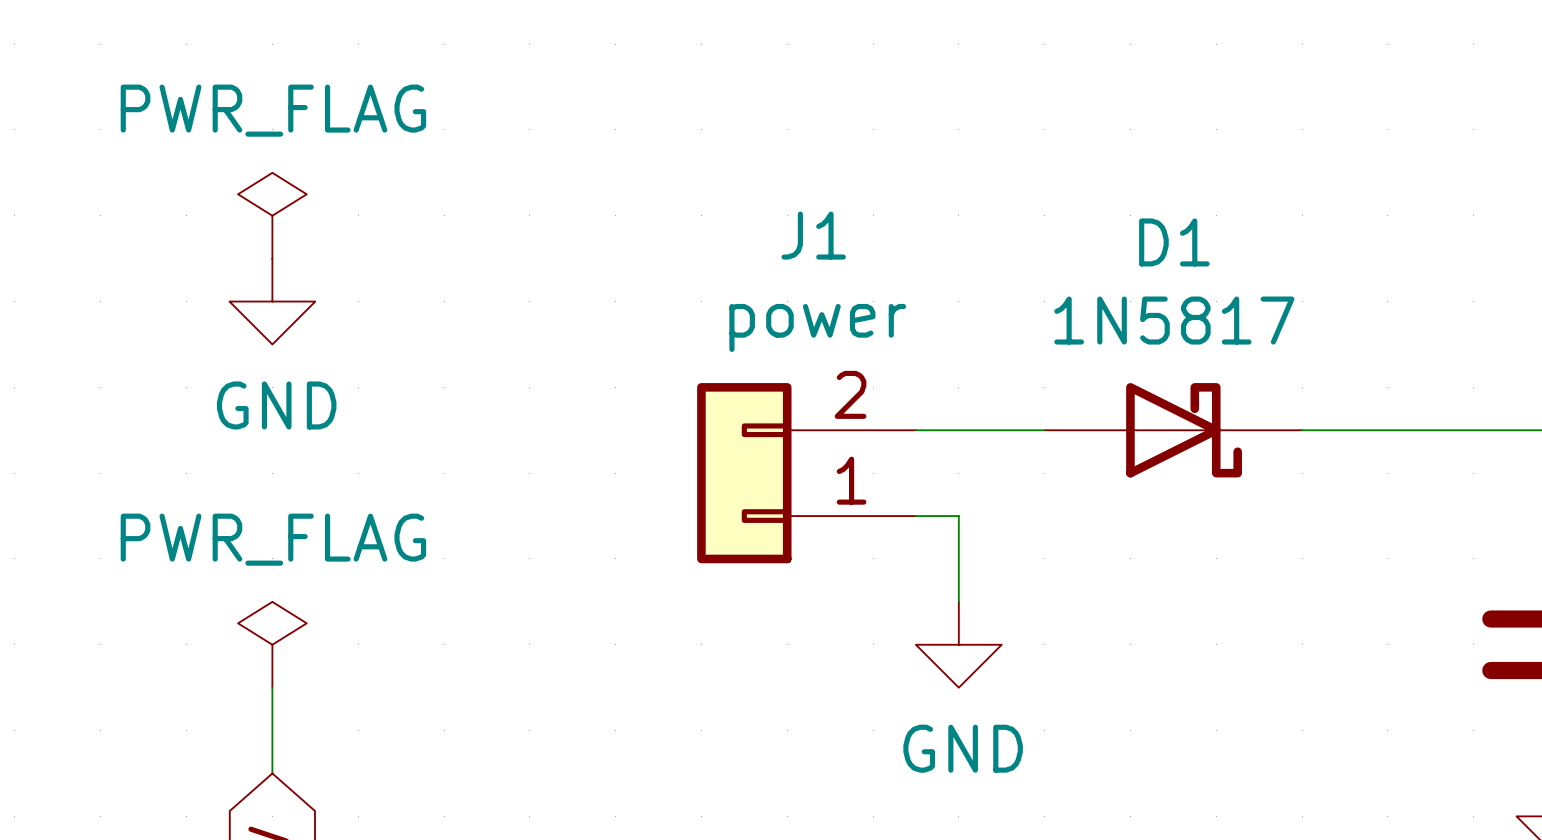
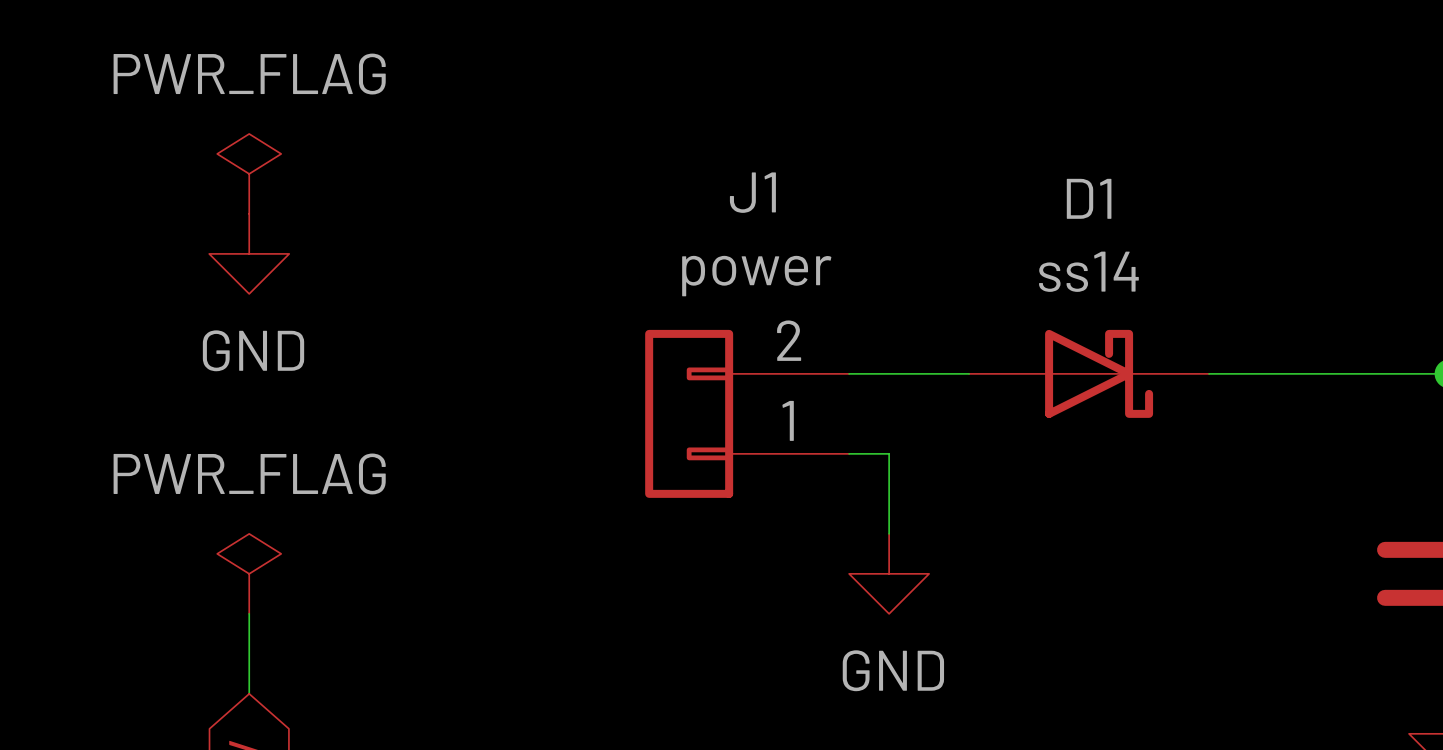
D1 value: 1N5817 (1174, 320) -> ss14 (1088, 271)

